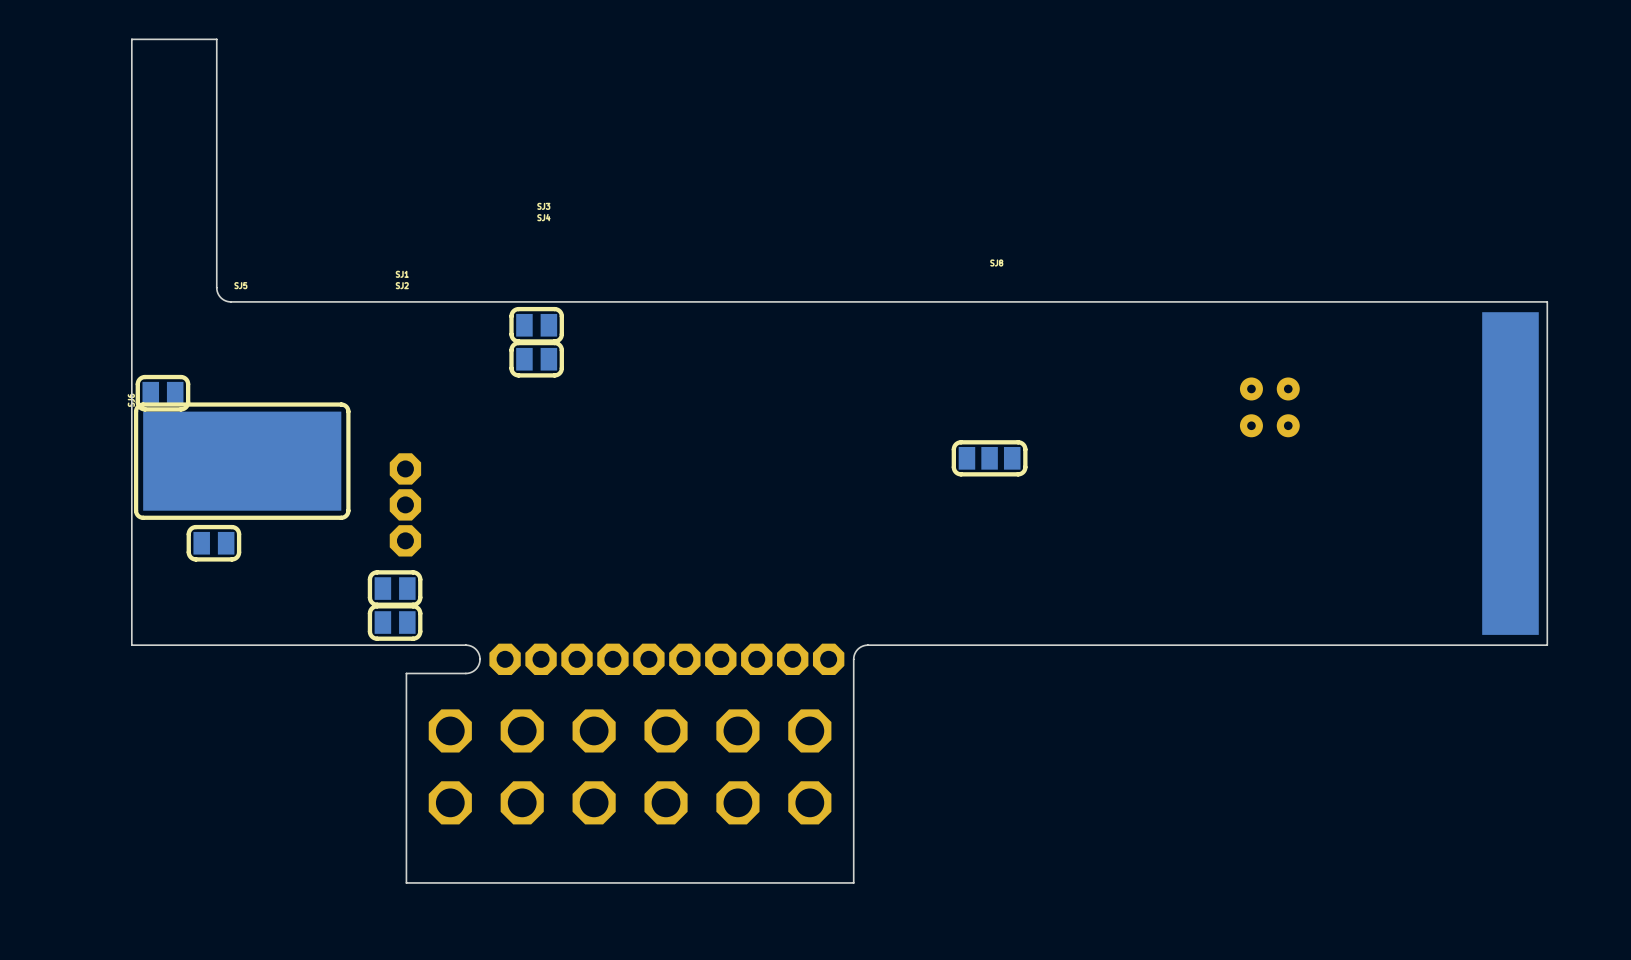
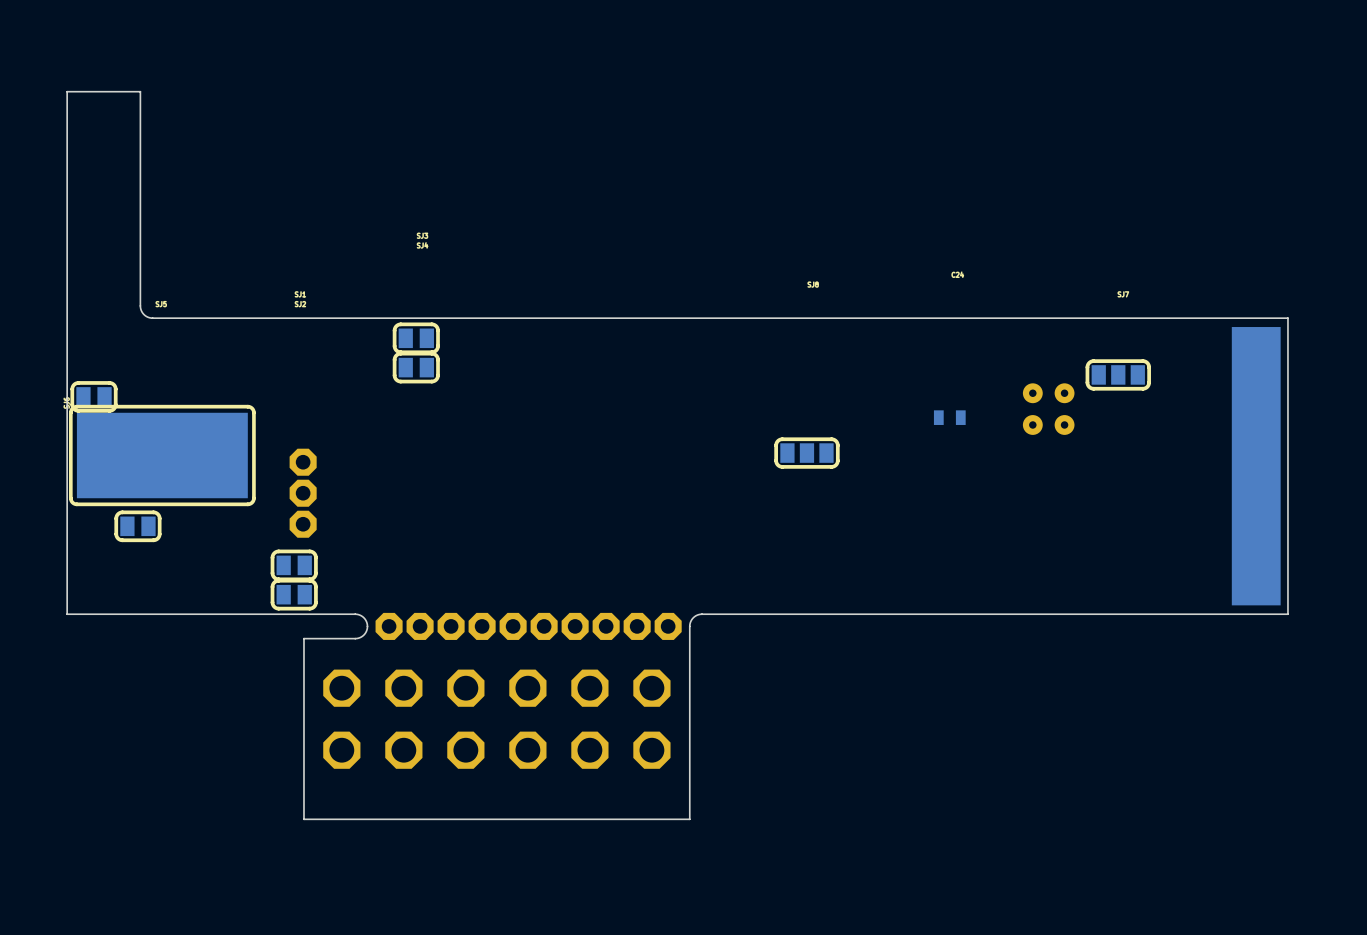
part: none -> (1118, 374)
part: none -> (949, 417)

